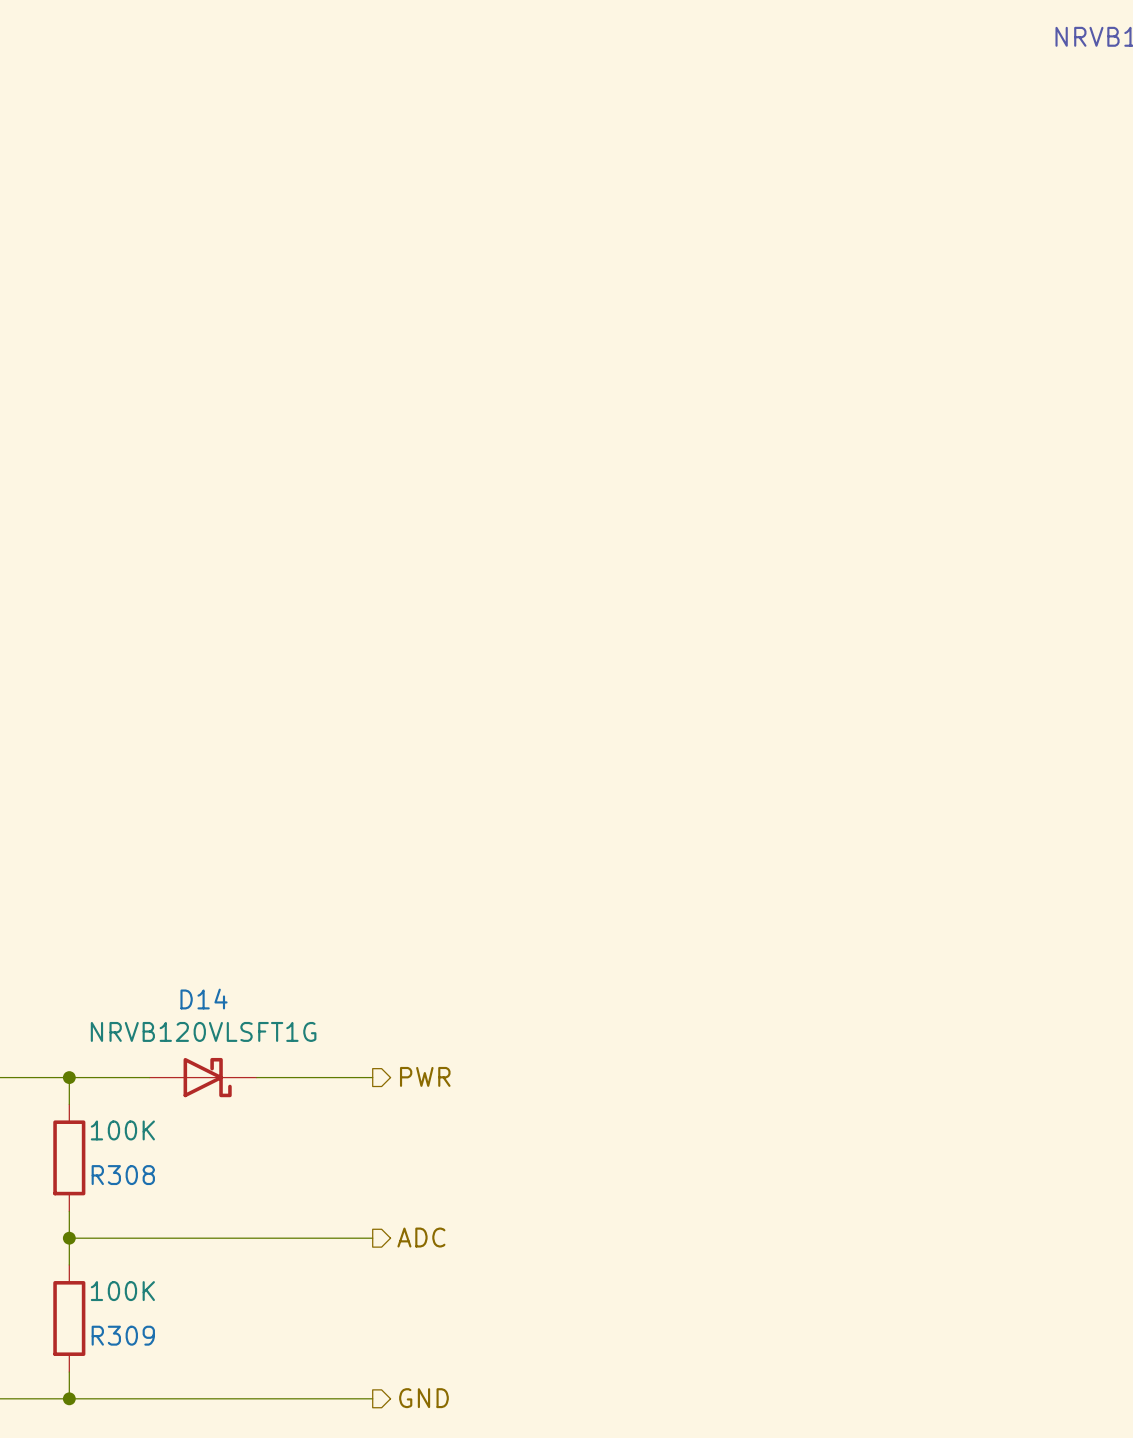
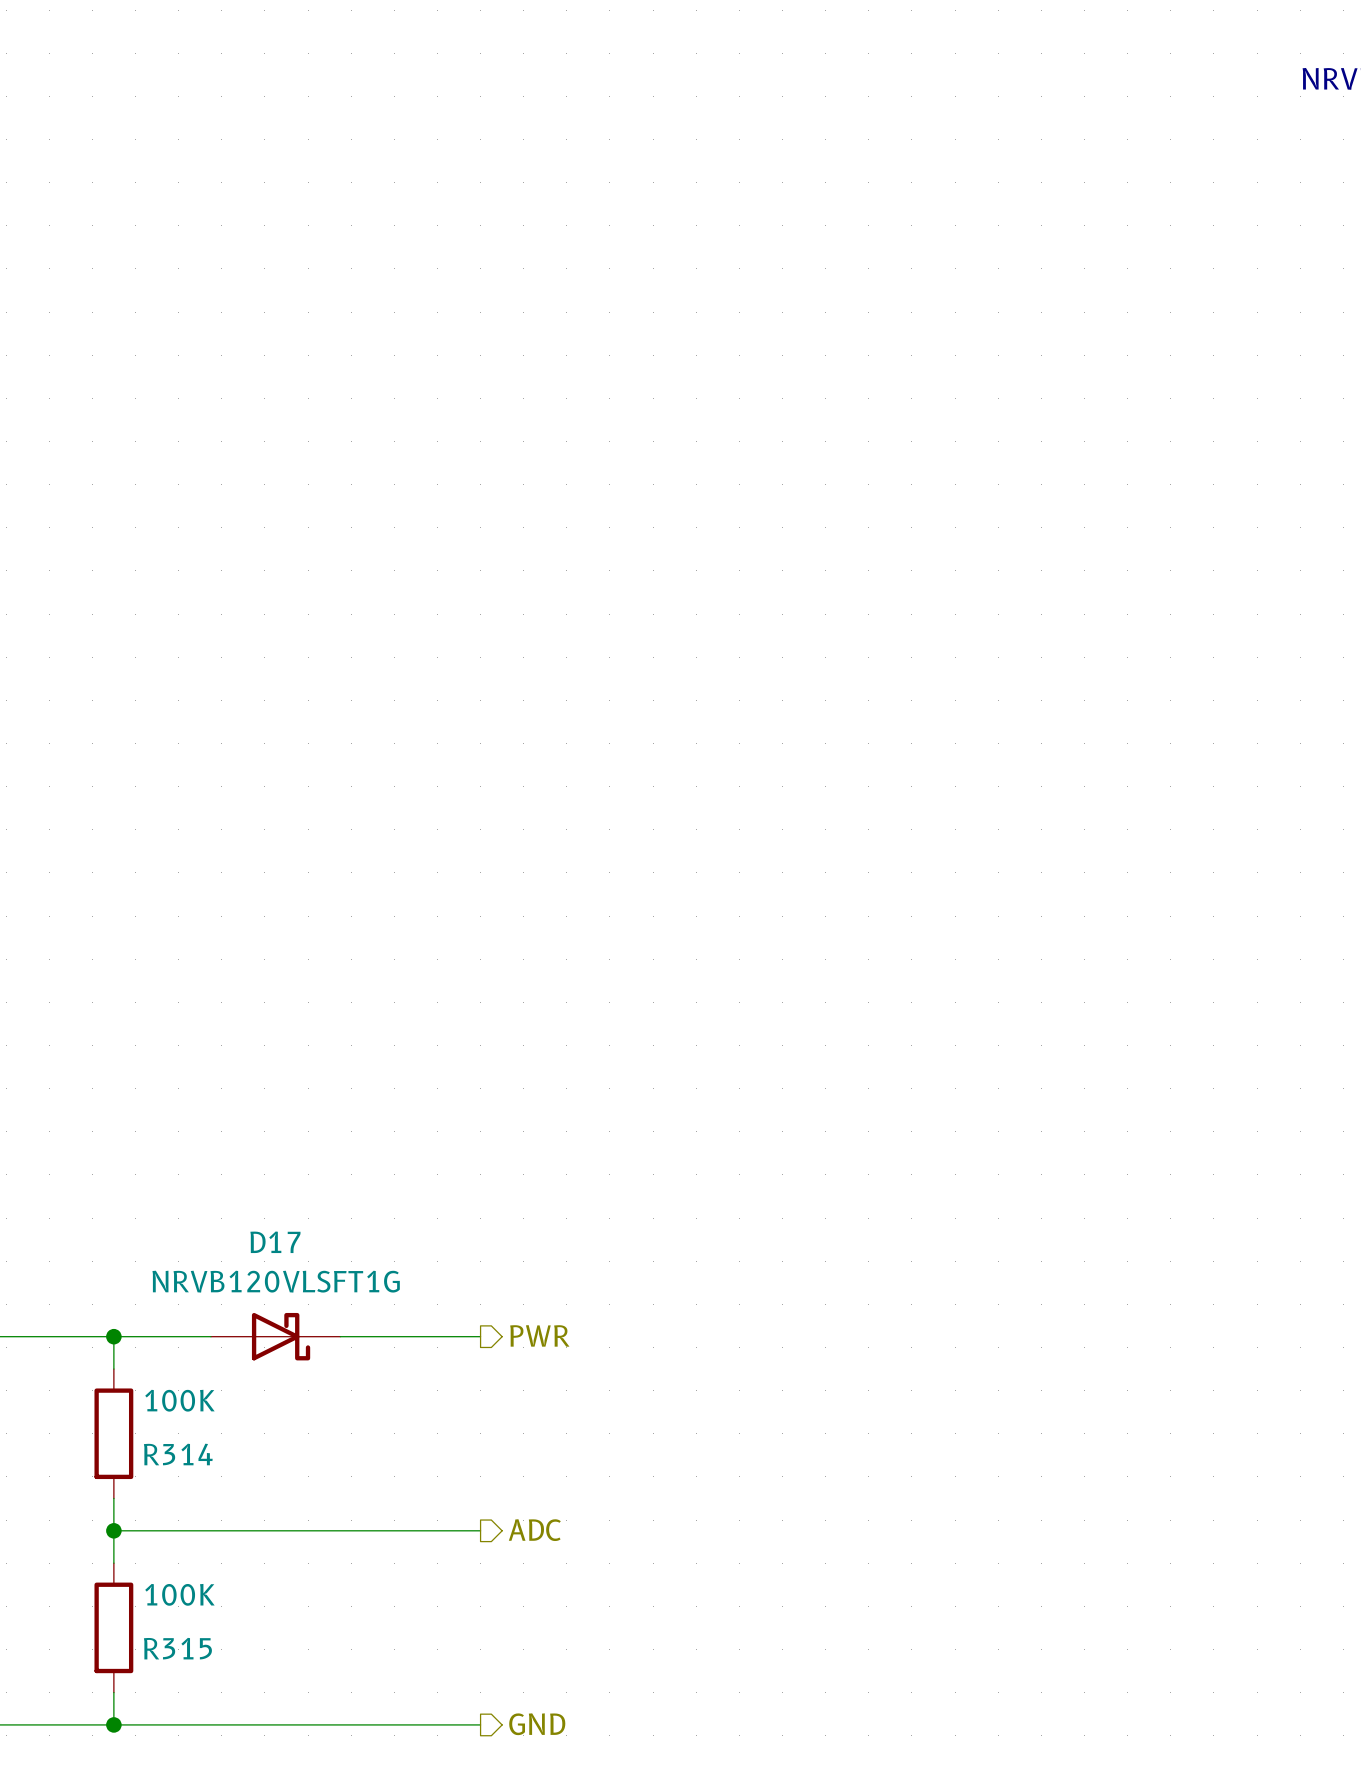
D14 name: D14 (204, 999) -> D17 (275, 1242)
R308 name: R308 (123, 1175) -> R314 (178, 1454)
R309 name: R309 (123, 1335) -> R315 (177, 1648)

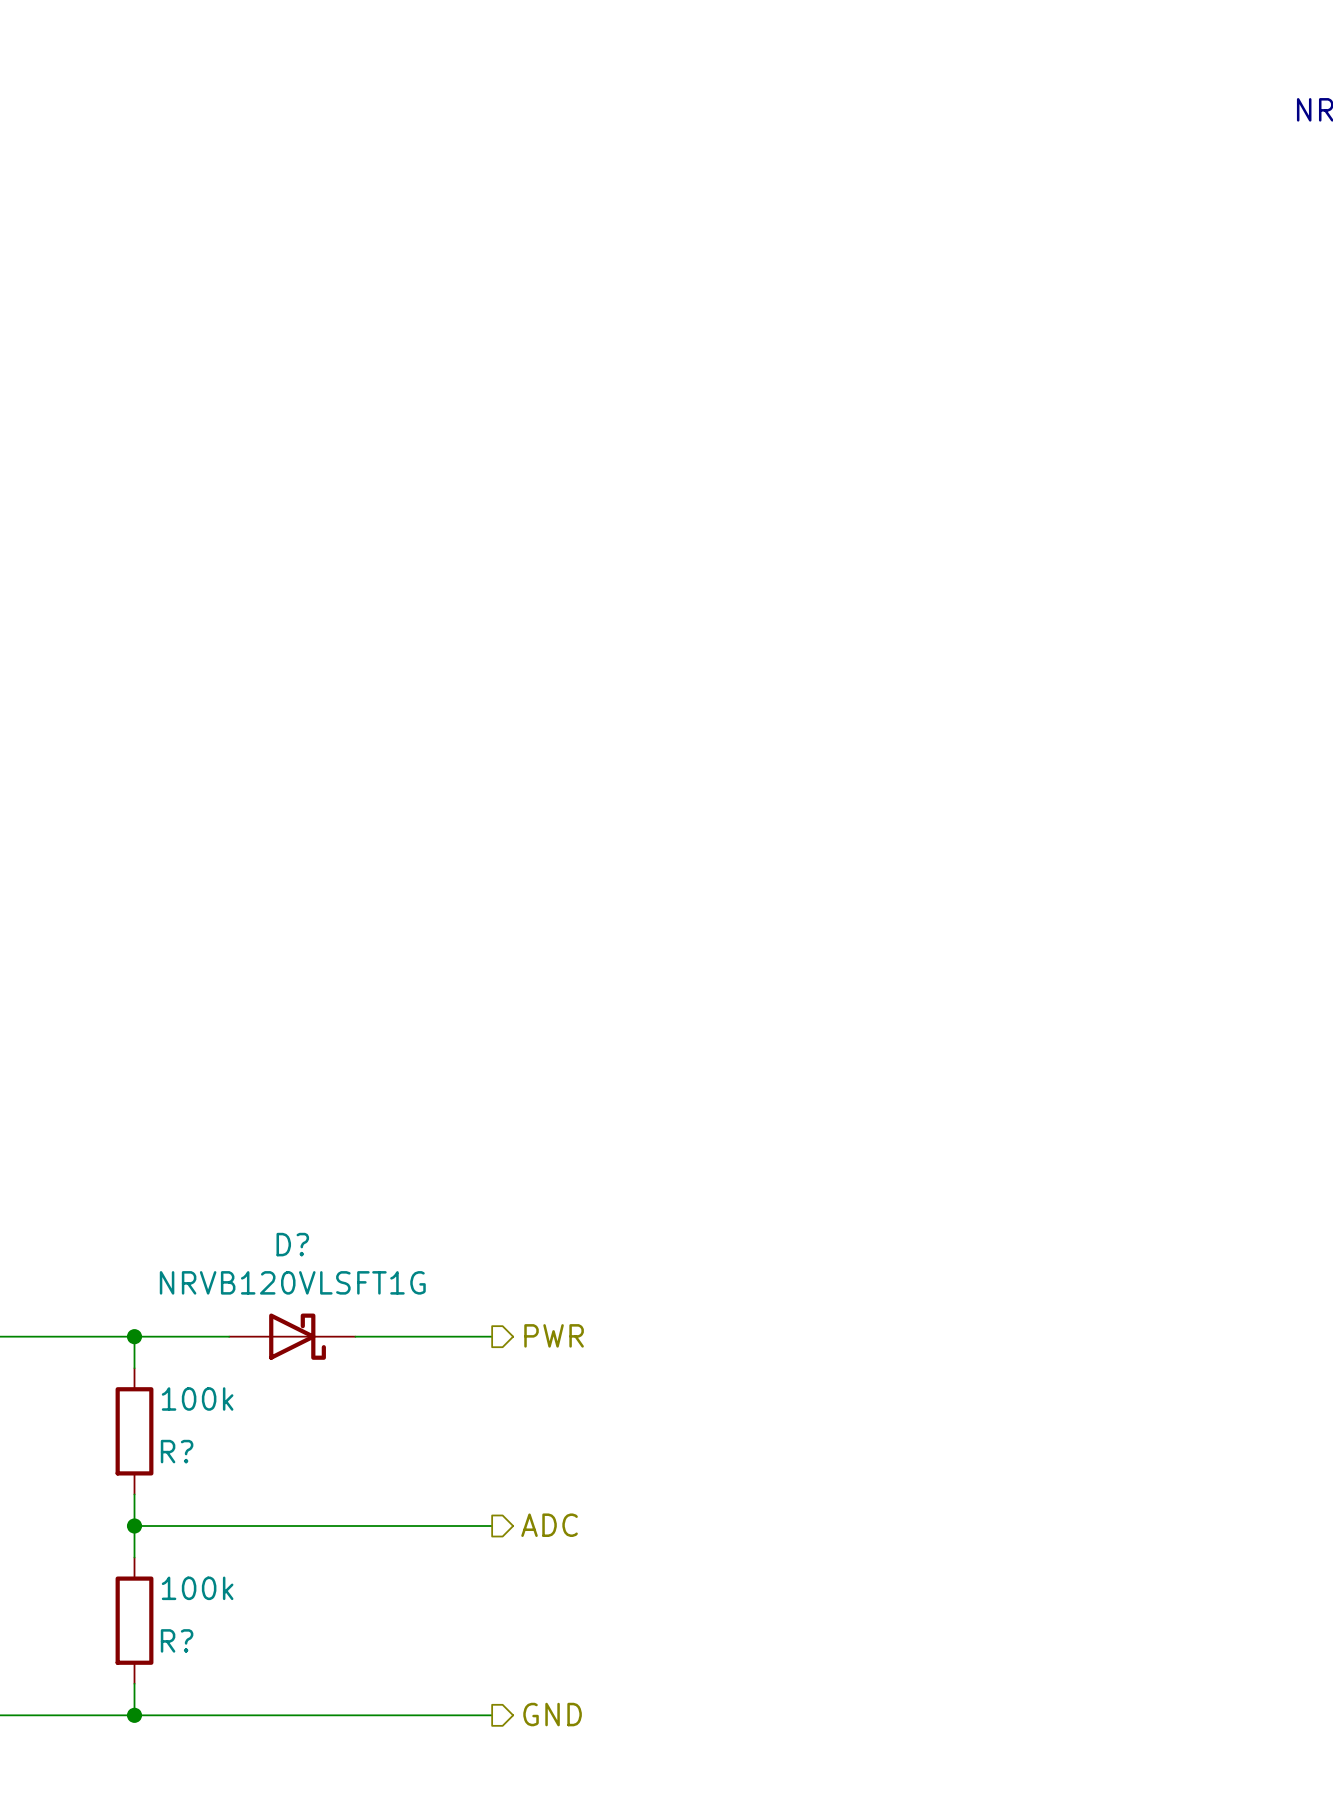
D17 name: D17 (275, 1242) -> D? (292, 1244)
R314 value: 100K (179, 1400) -> 100k (197, 1398)
R314 name: R314 (178, 1454) -> R? (177, 1451)
R315 value: 100K (179, 1594) -> 100k (197, 1588)
R315 name: R315 (177, 1648) -> R? (177, 1640)

